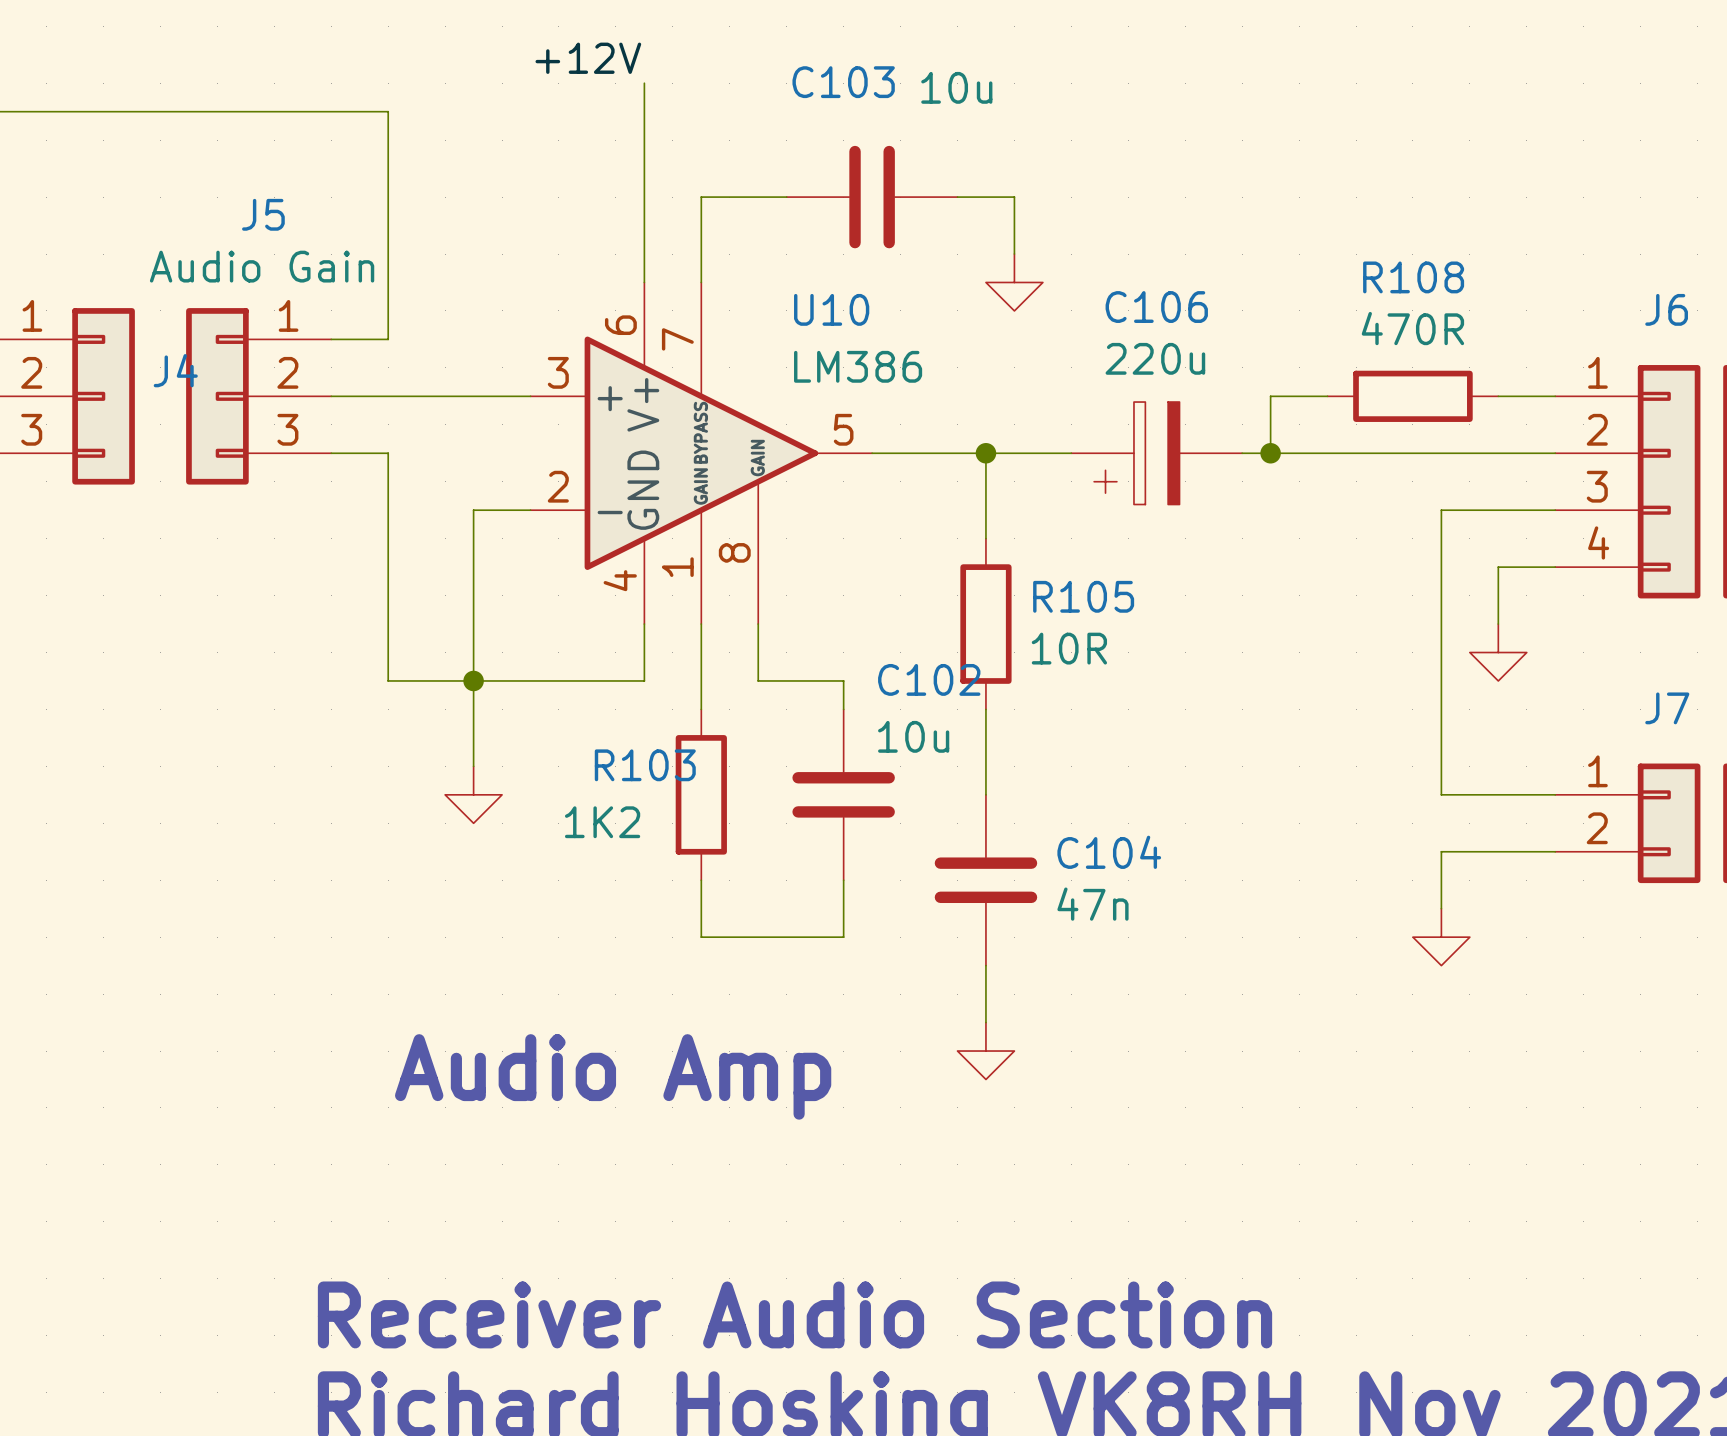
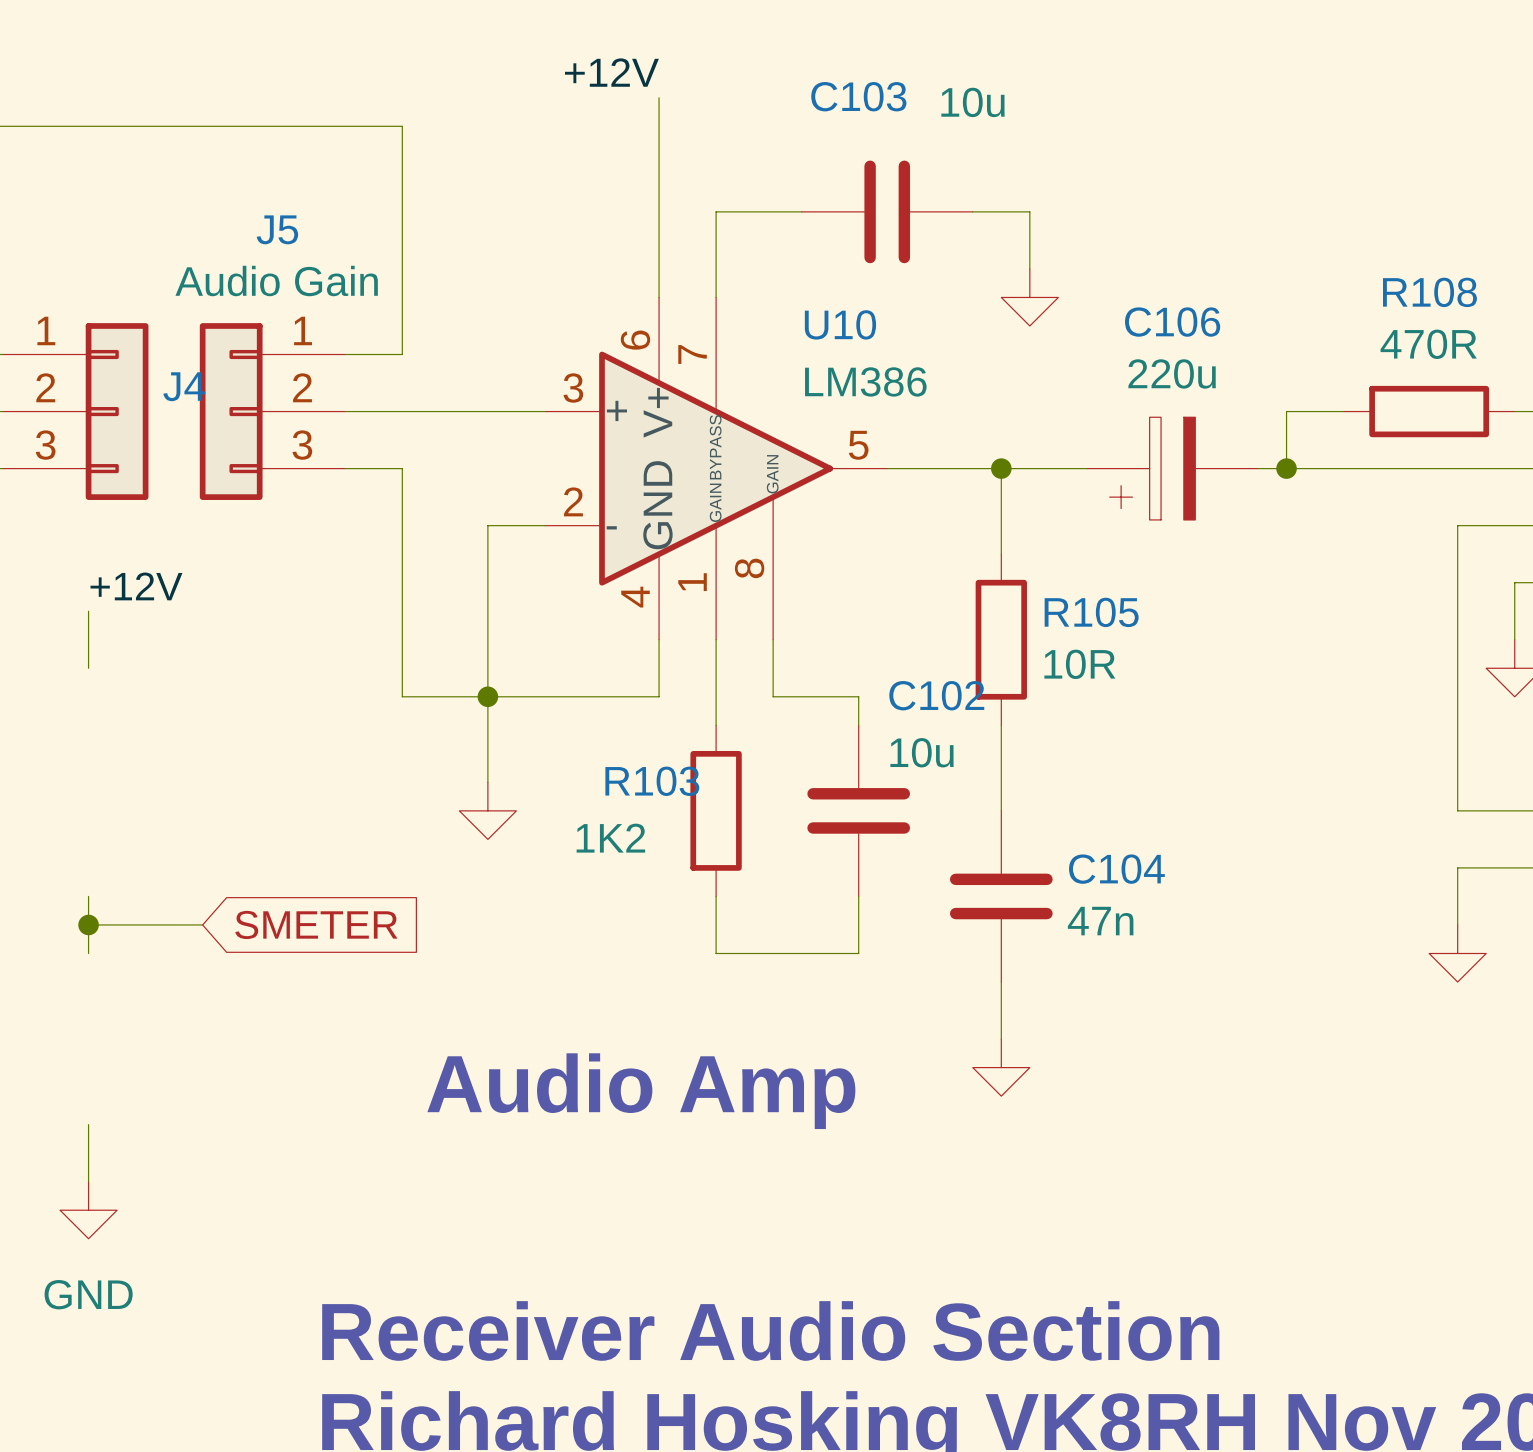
label: none -> +12V (136, 586)
wire: none -> (88, 611) (88, 668)
wire: none -> (88, 896) (88, 953)
wire: none -> (88, 924) (202, 924)
junction: none -> (88, 924)
global label: none -> SMETER (316, 924)
wire: none -> (88, 1124) (88, 1181)
power symbol: none -> GND (88, 1210)

